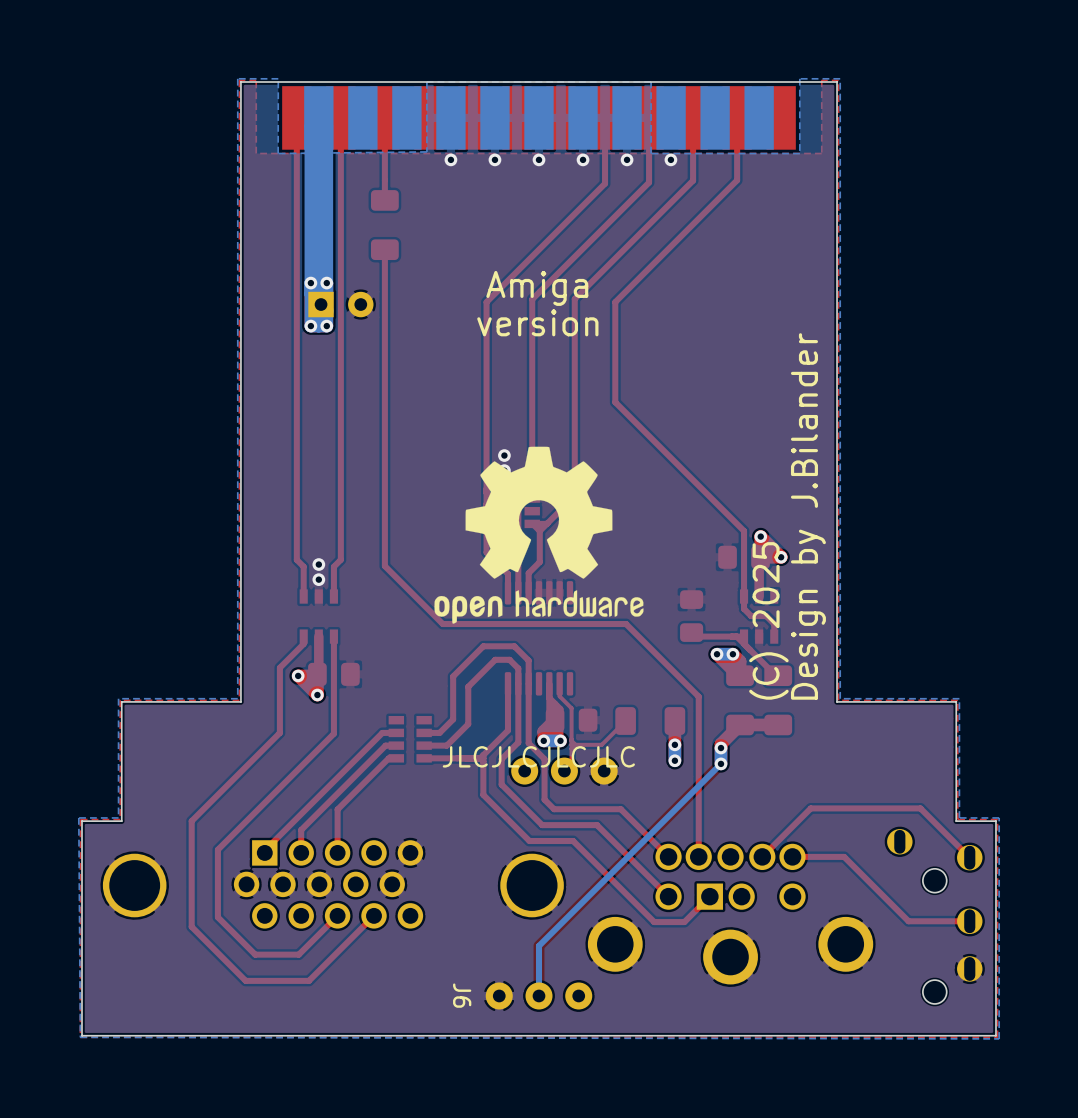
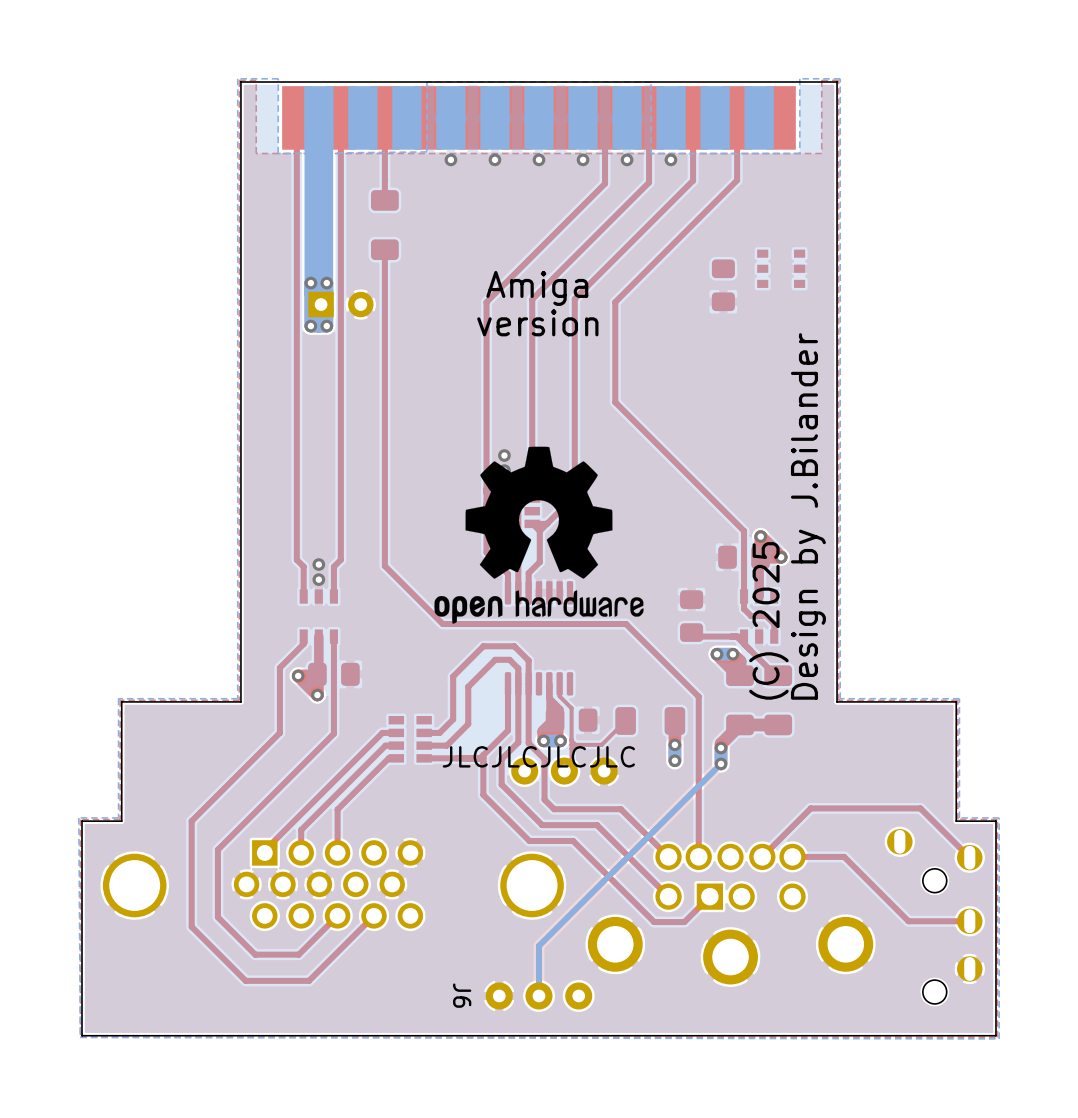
part: none -> (781, 268)
part: none -> (723, 285)

